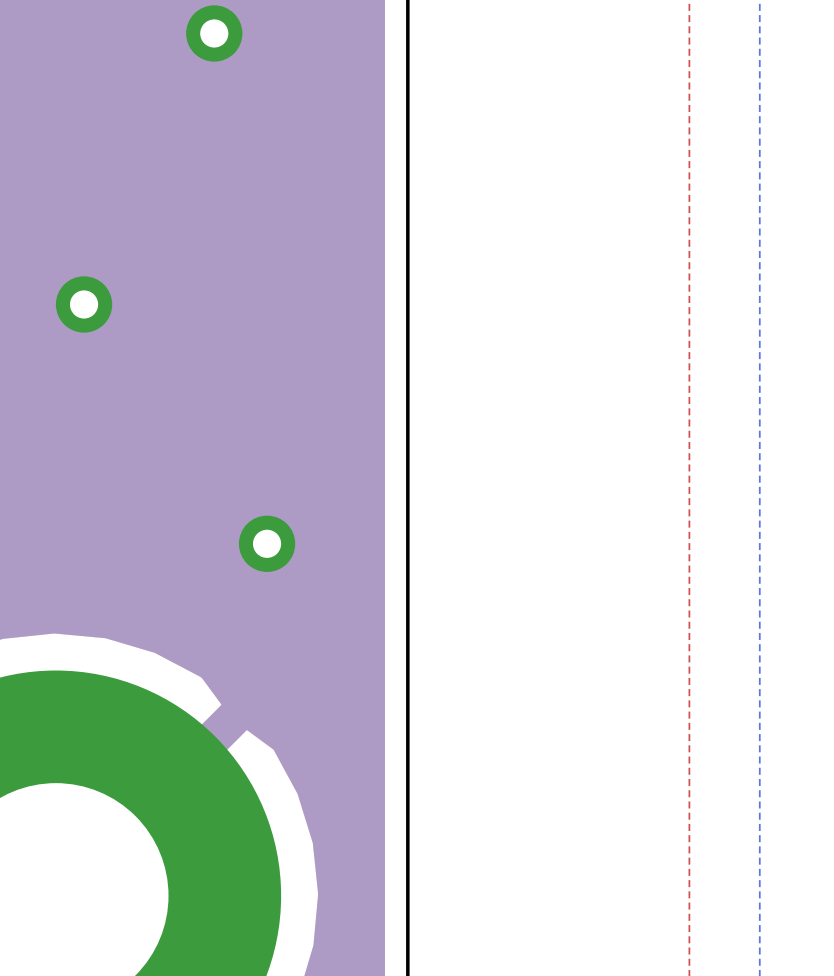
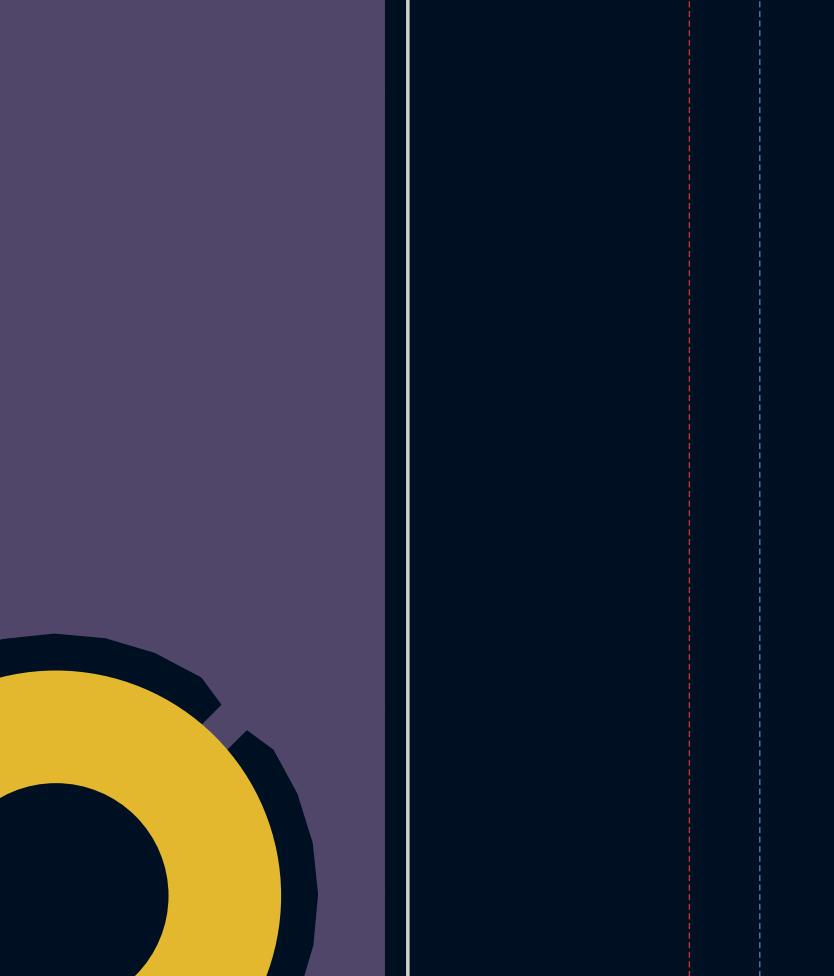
via: (214, 33) -> none
via: (84, 304) -> none
via: (267, 543) -> none

